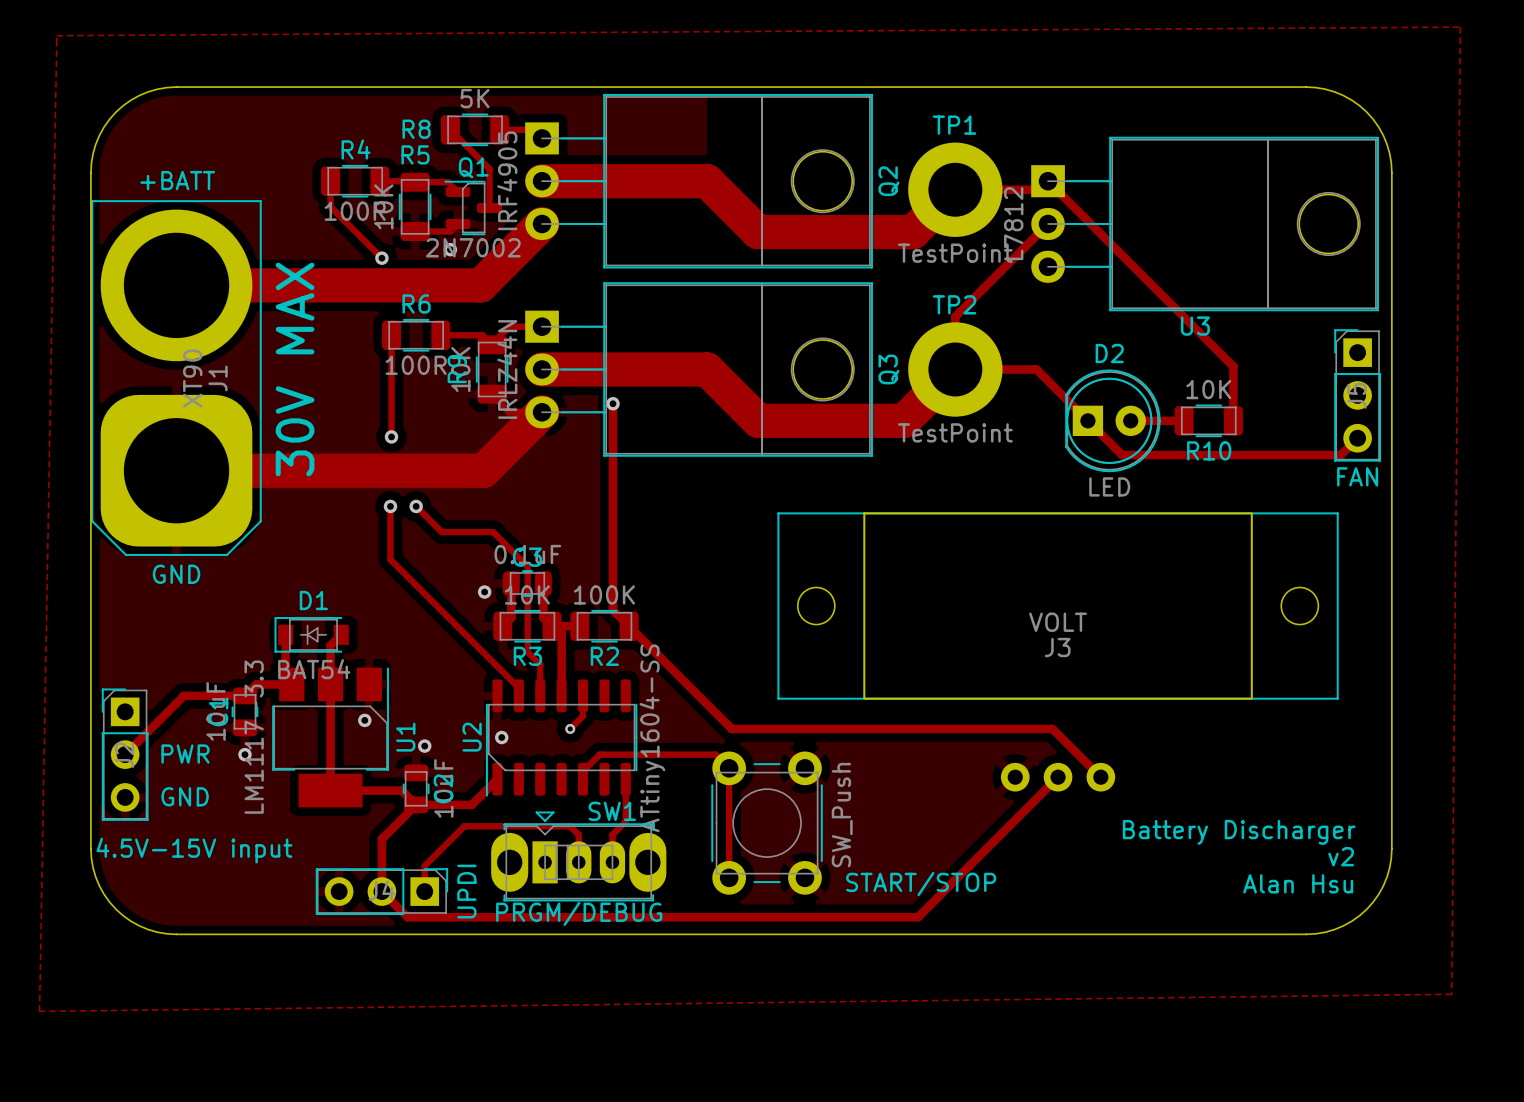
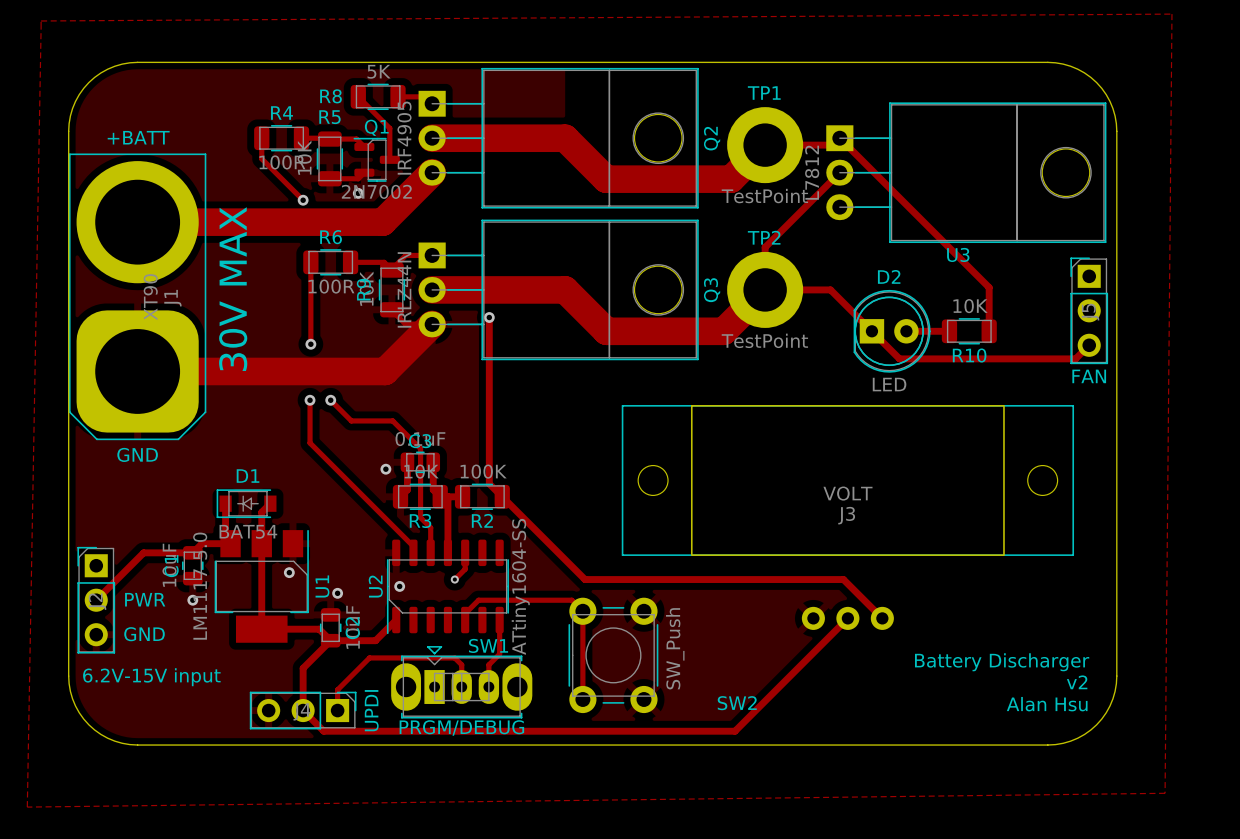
U1 value: LM1117-3.3 (254, 737) -> LM1117-5.0 (200, 586)
text: 4.5V-15V input (194, 850) -> 6.2V-15V input (151, 677)
START/STOP name: START/STOP (921, 883) -> SW2 (737, 703)

